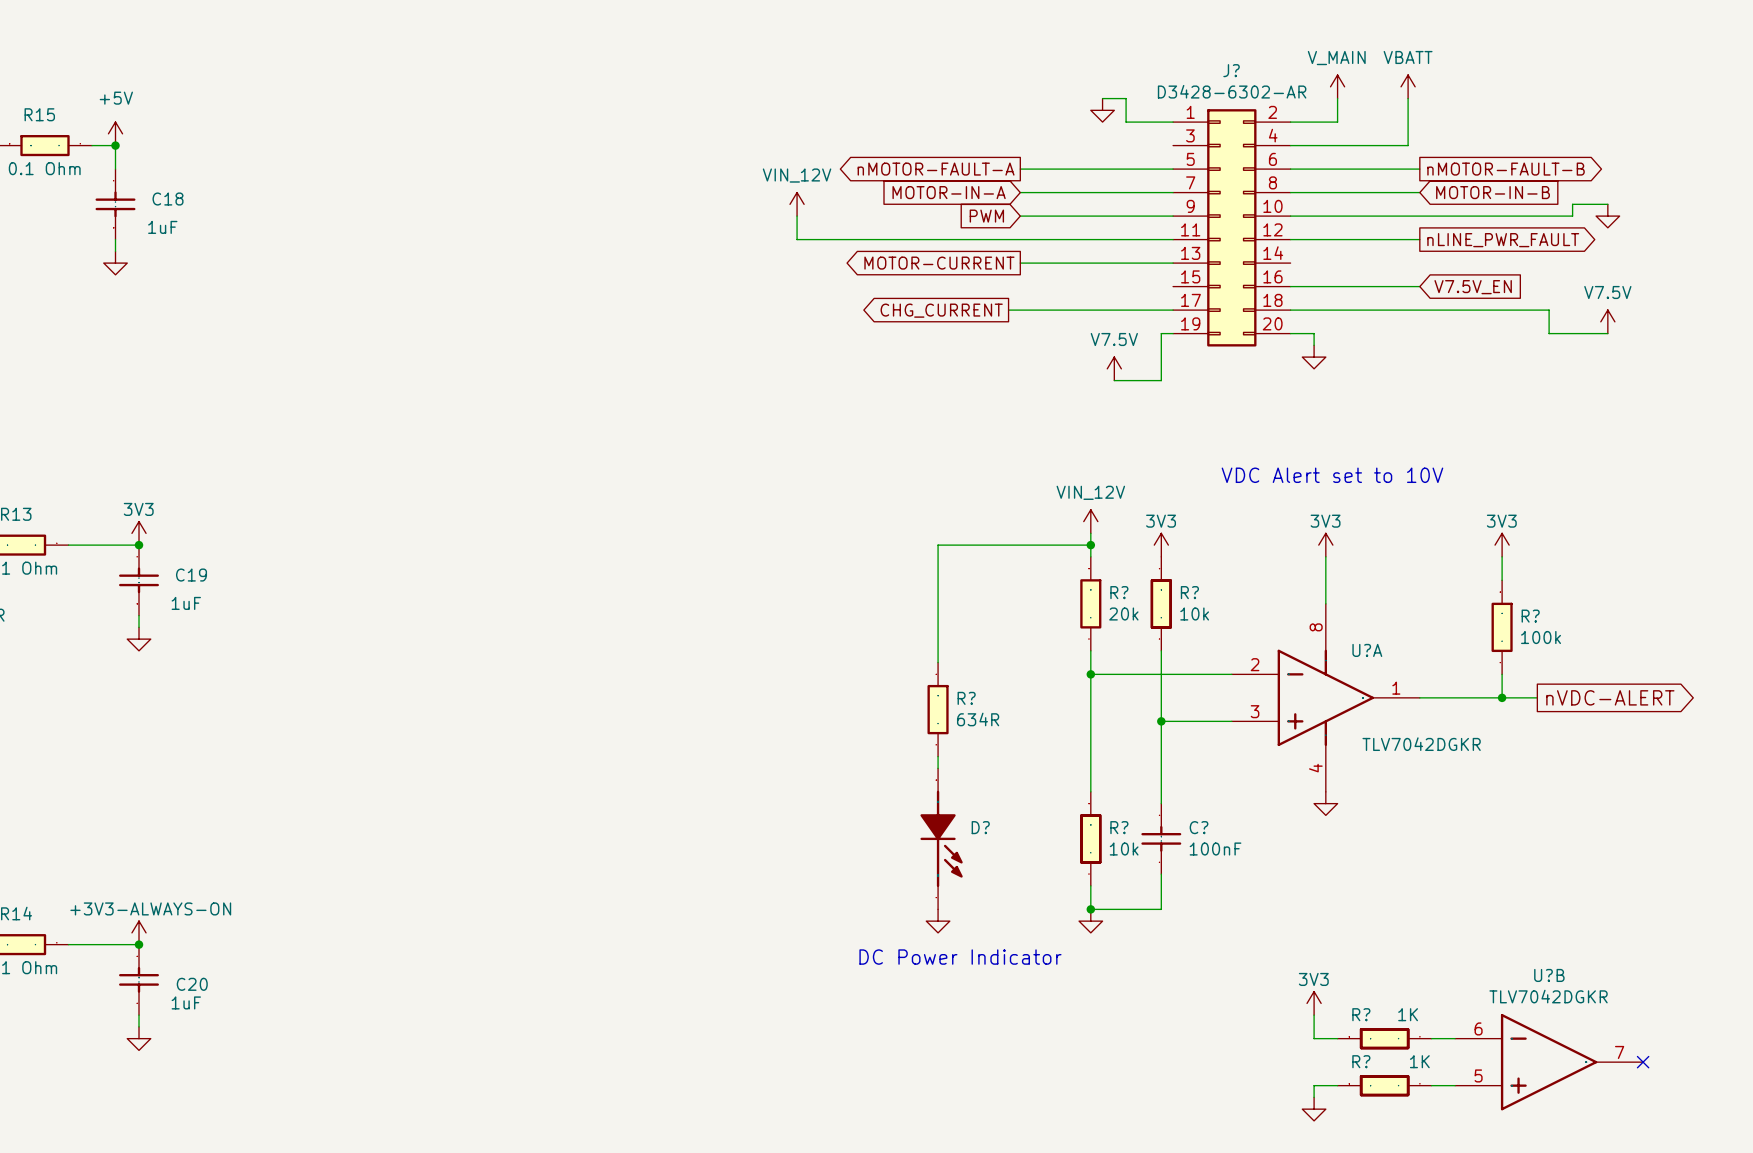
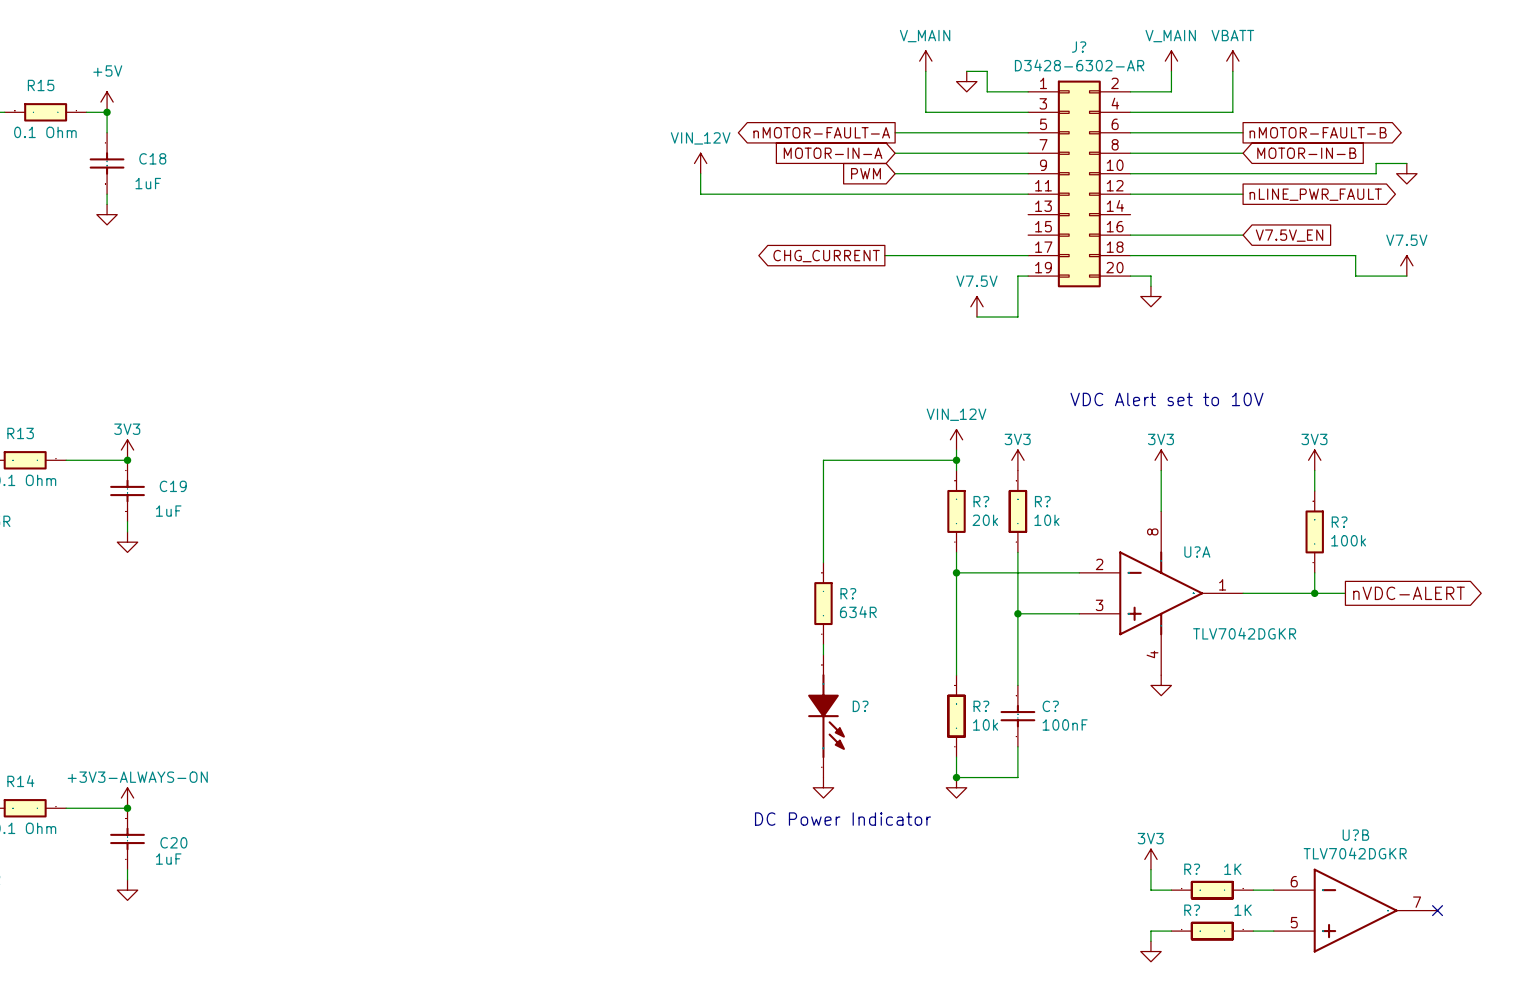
power symbol: none -> V_MAIN (925, 61)
wire: none -> (925, 71) (925, 112) (1028, 112)
global label: MOTOR-CURRENT (939, 263) -> none
wire: (1020, 263) (1173, 263) -> none

